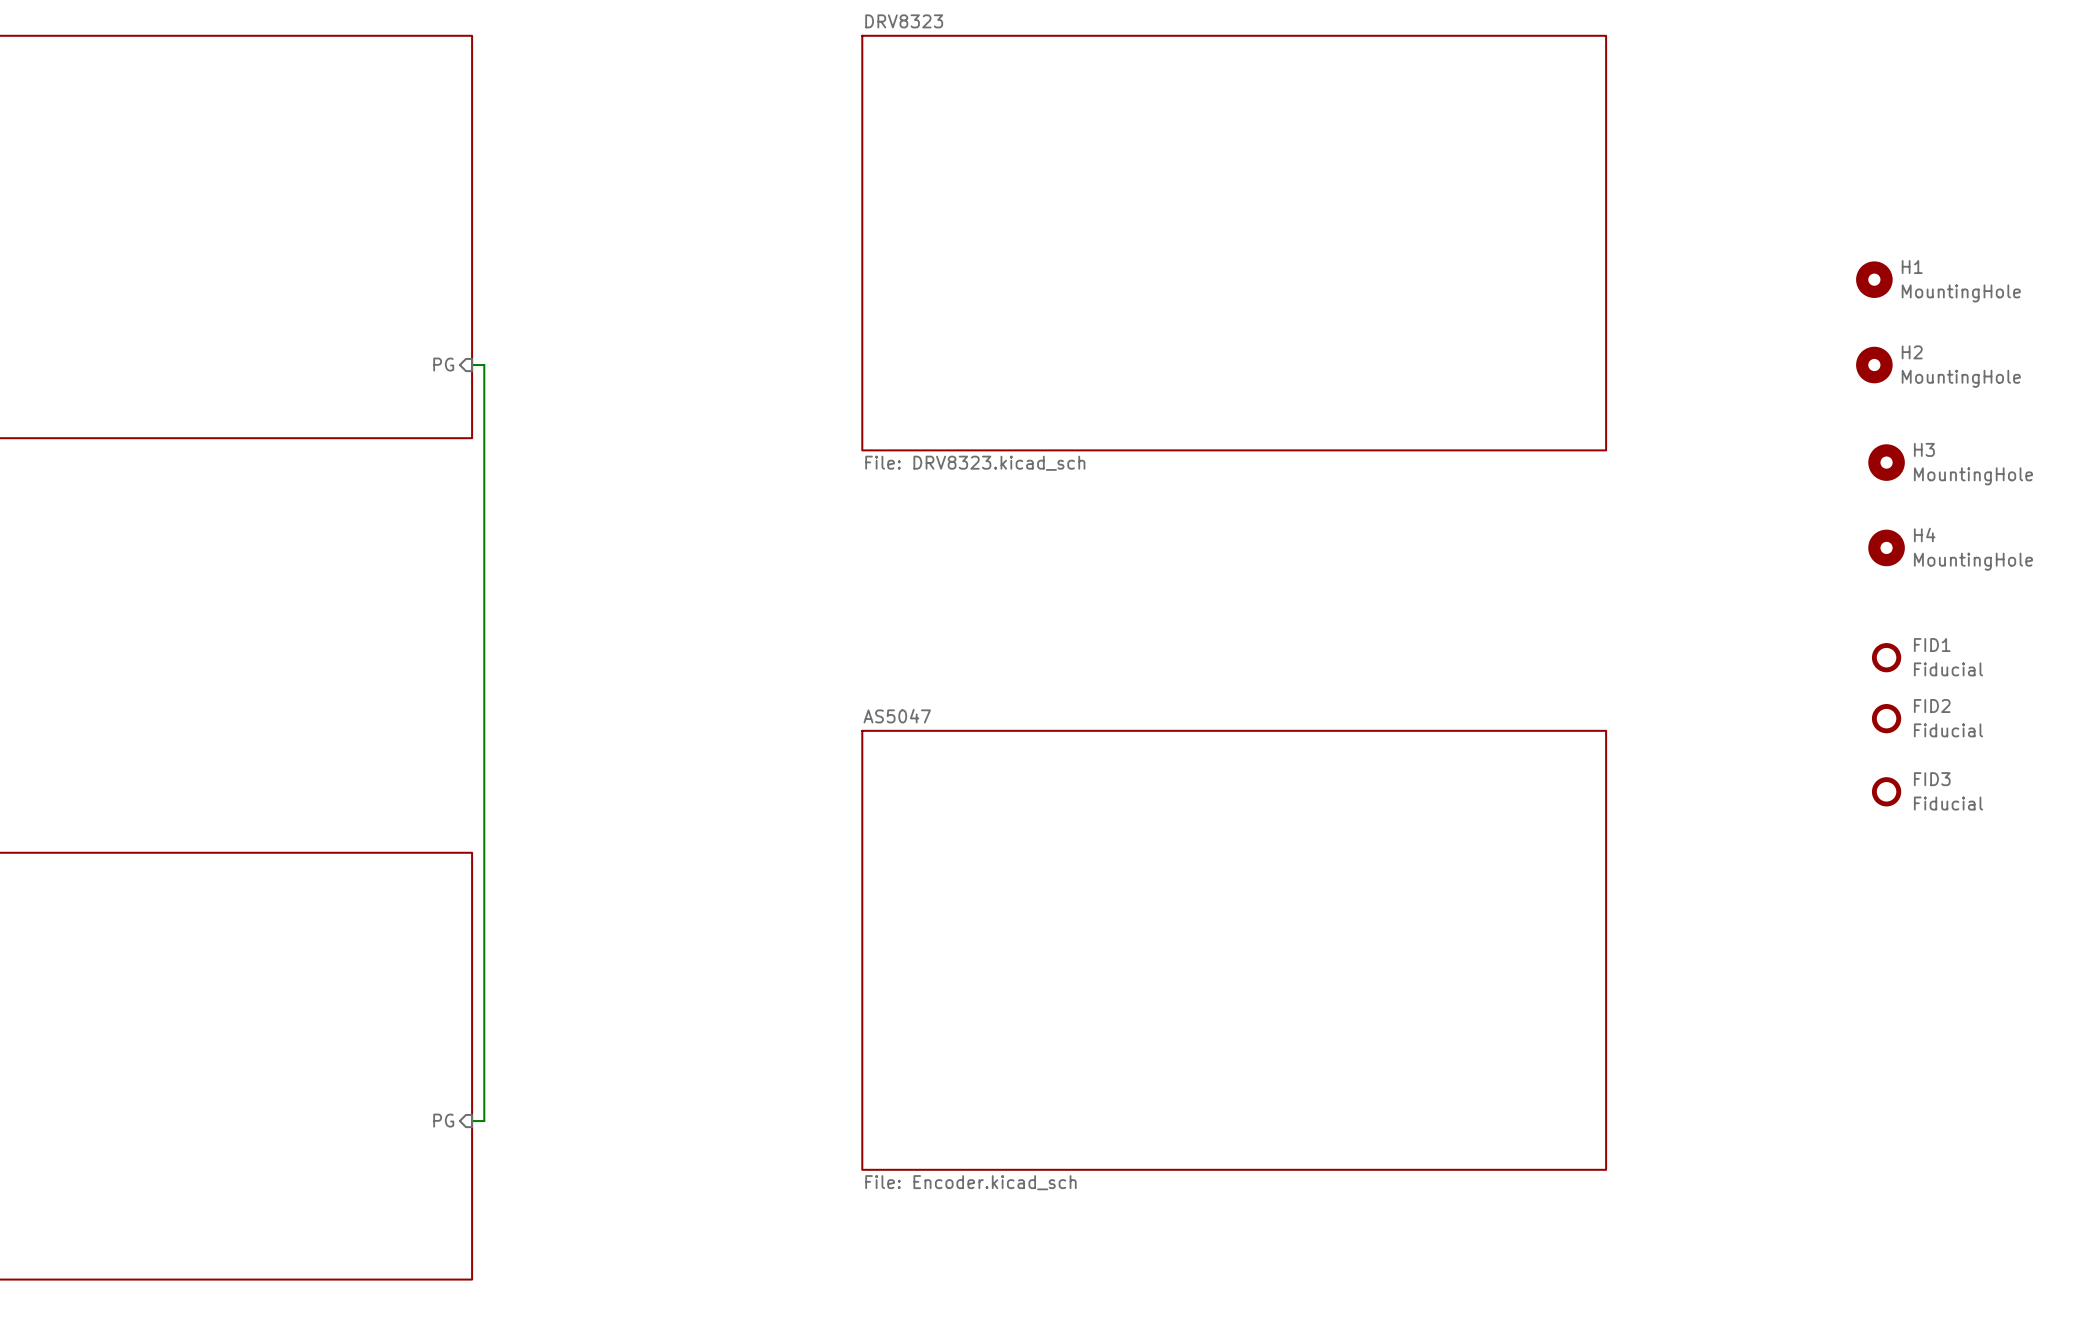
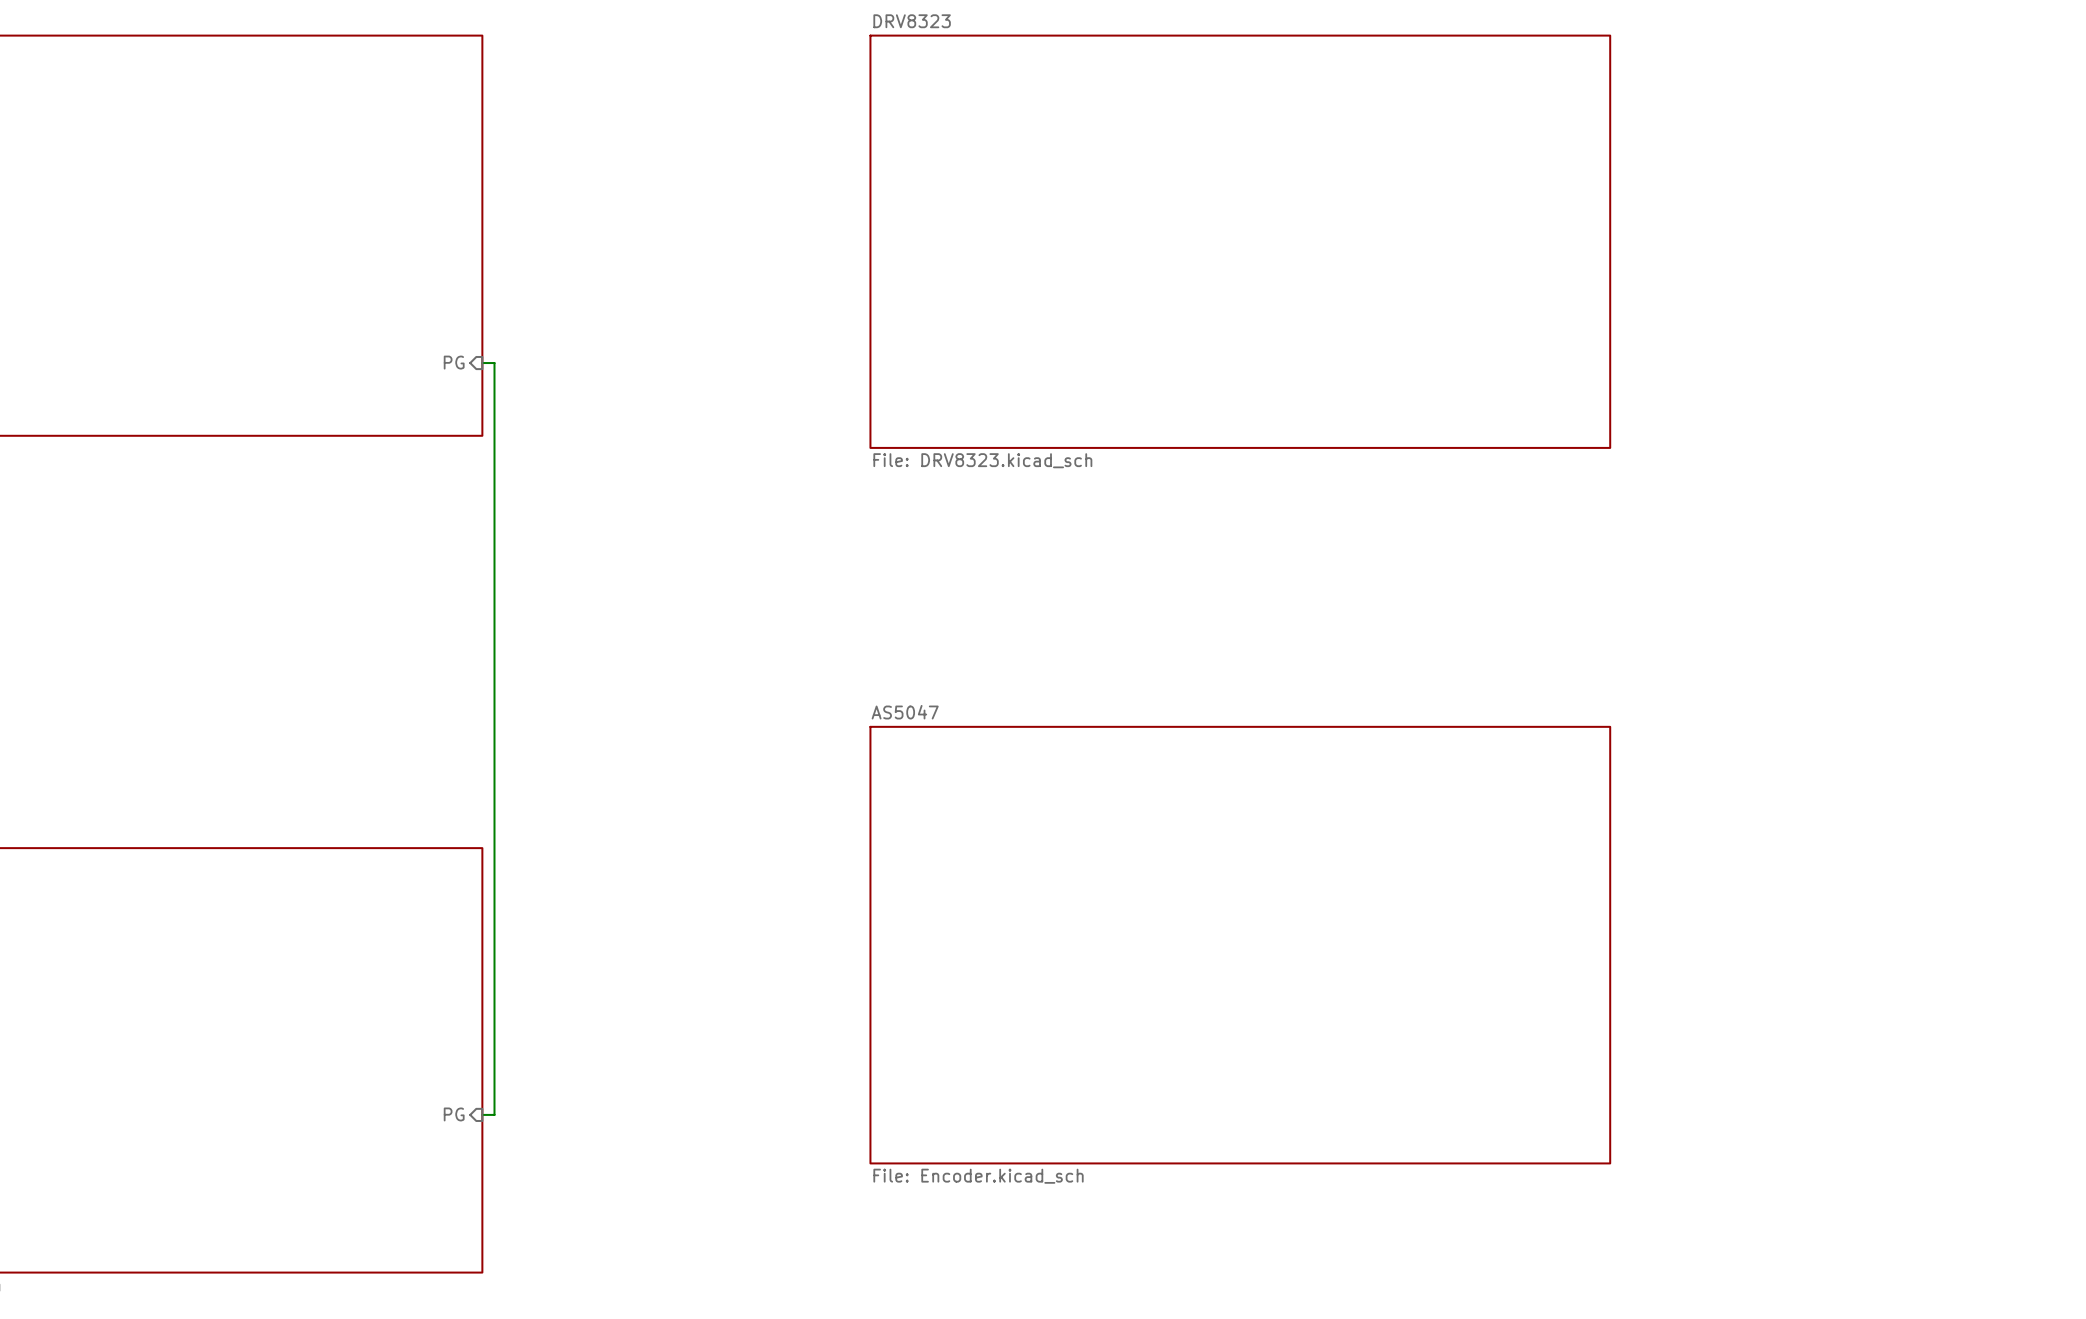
H1: MountingHole (1874, 279) -> none
H2: MountingHole (1874, 365) -> none
H3: MountingHole (1886, 462) -> none
H4: MountingHole (1886, 547) -> none
FID1: Fiducial (1886, 657) -> none
FID2: Fiducial (1886, 718) -> none
FID3: Fiducial (1886, 791) -> none

